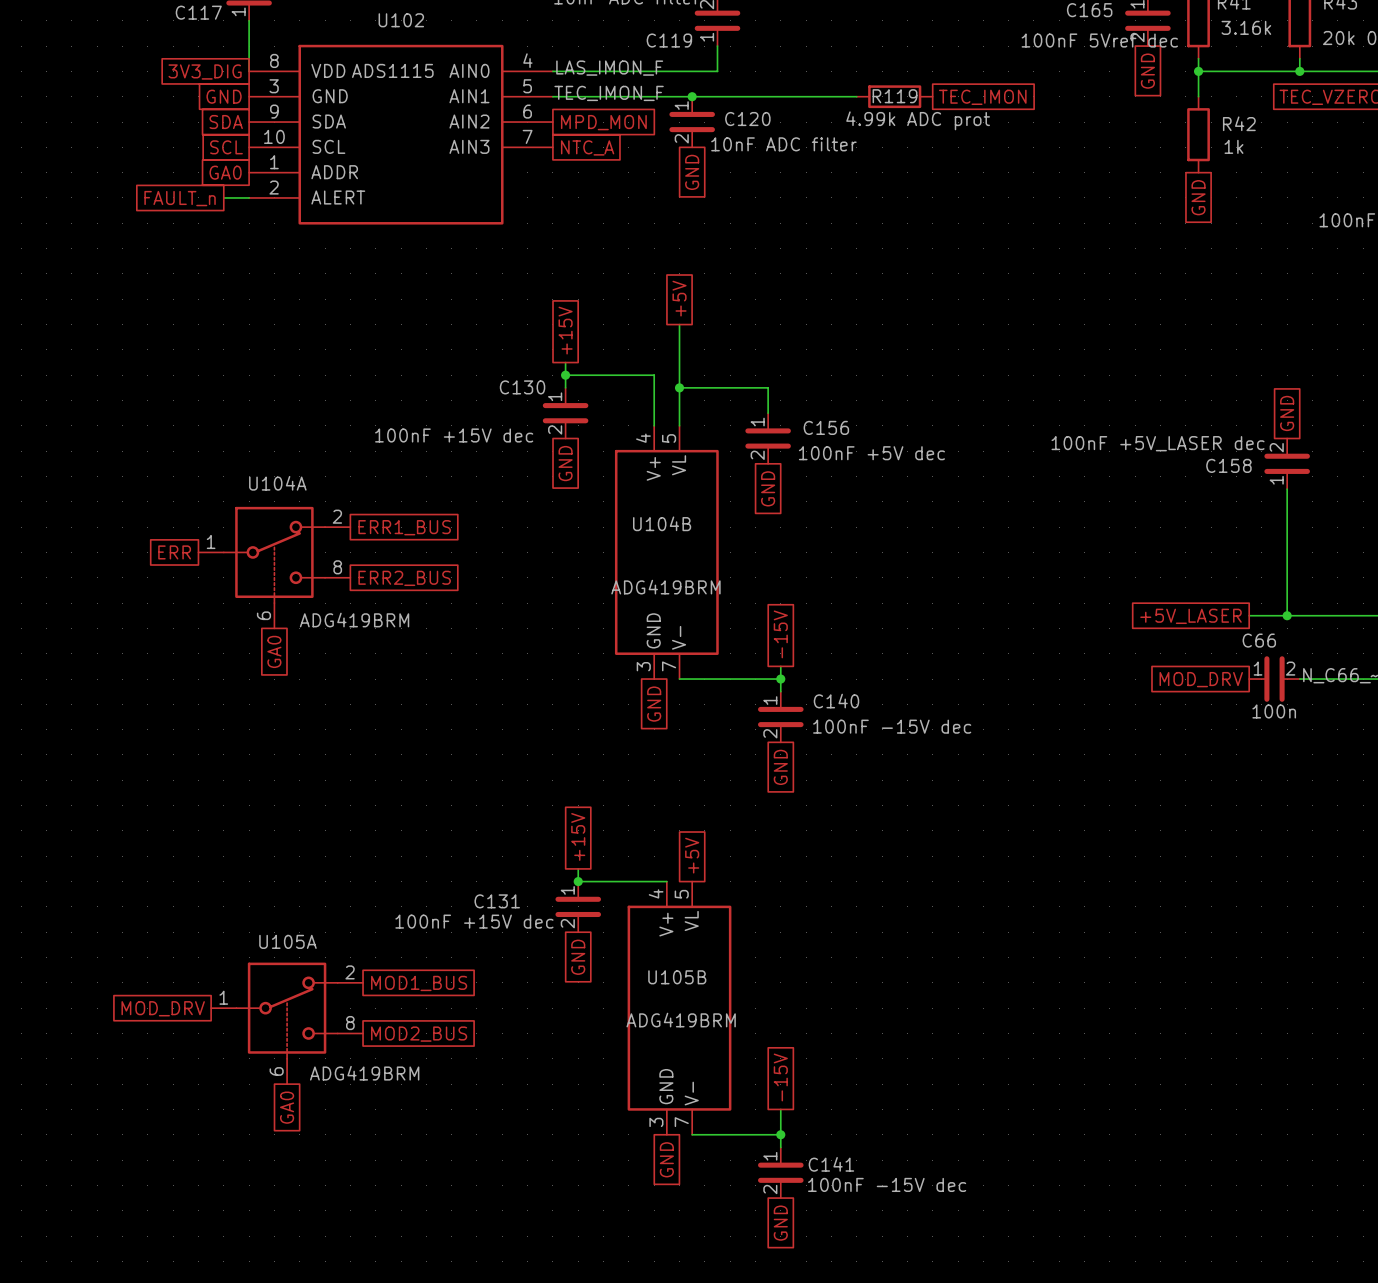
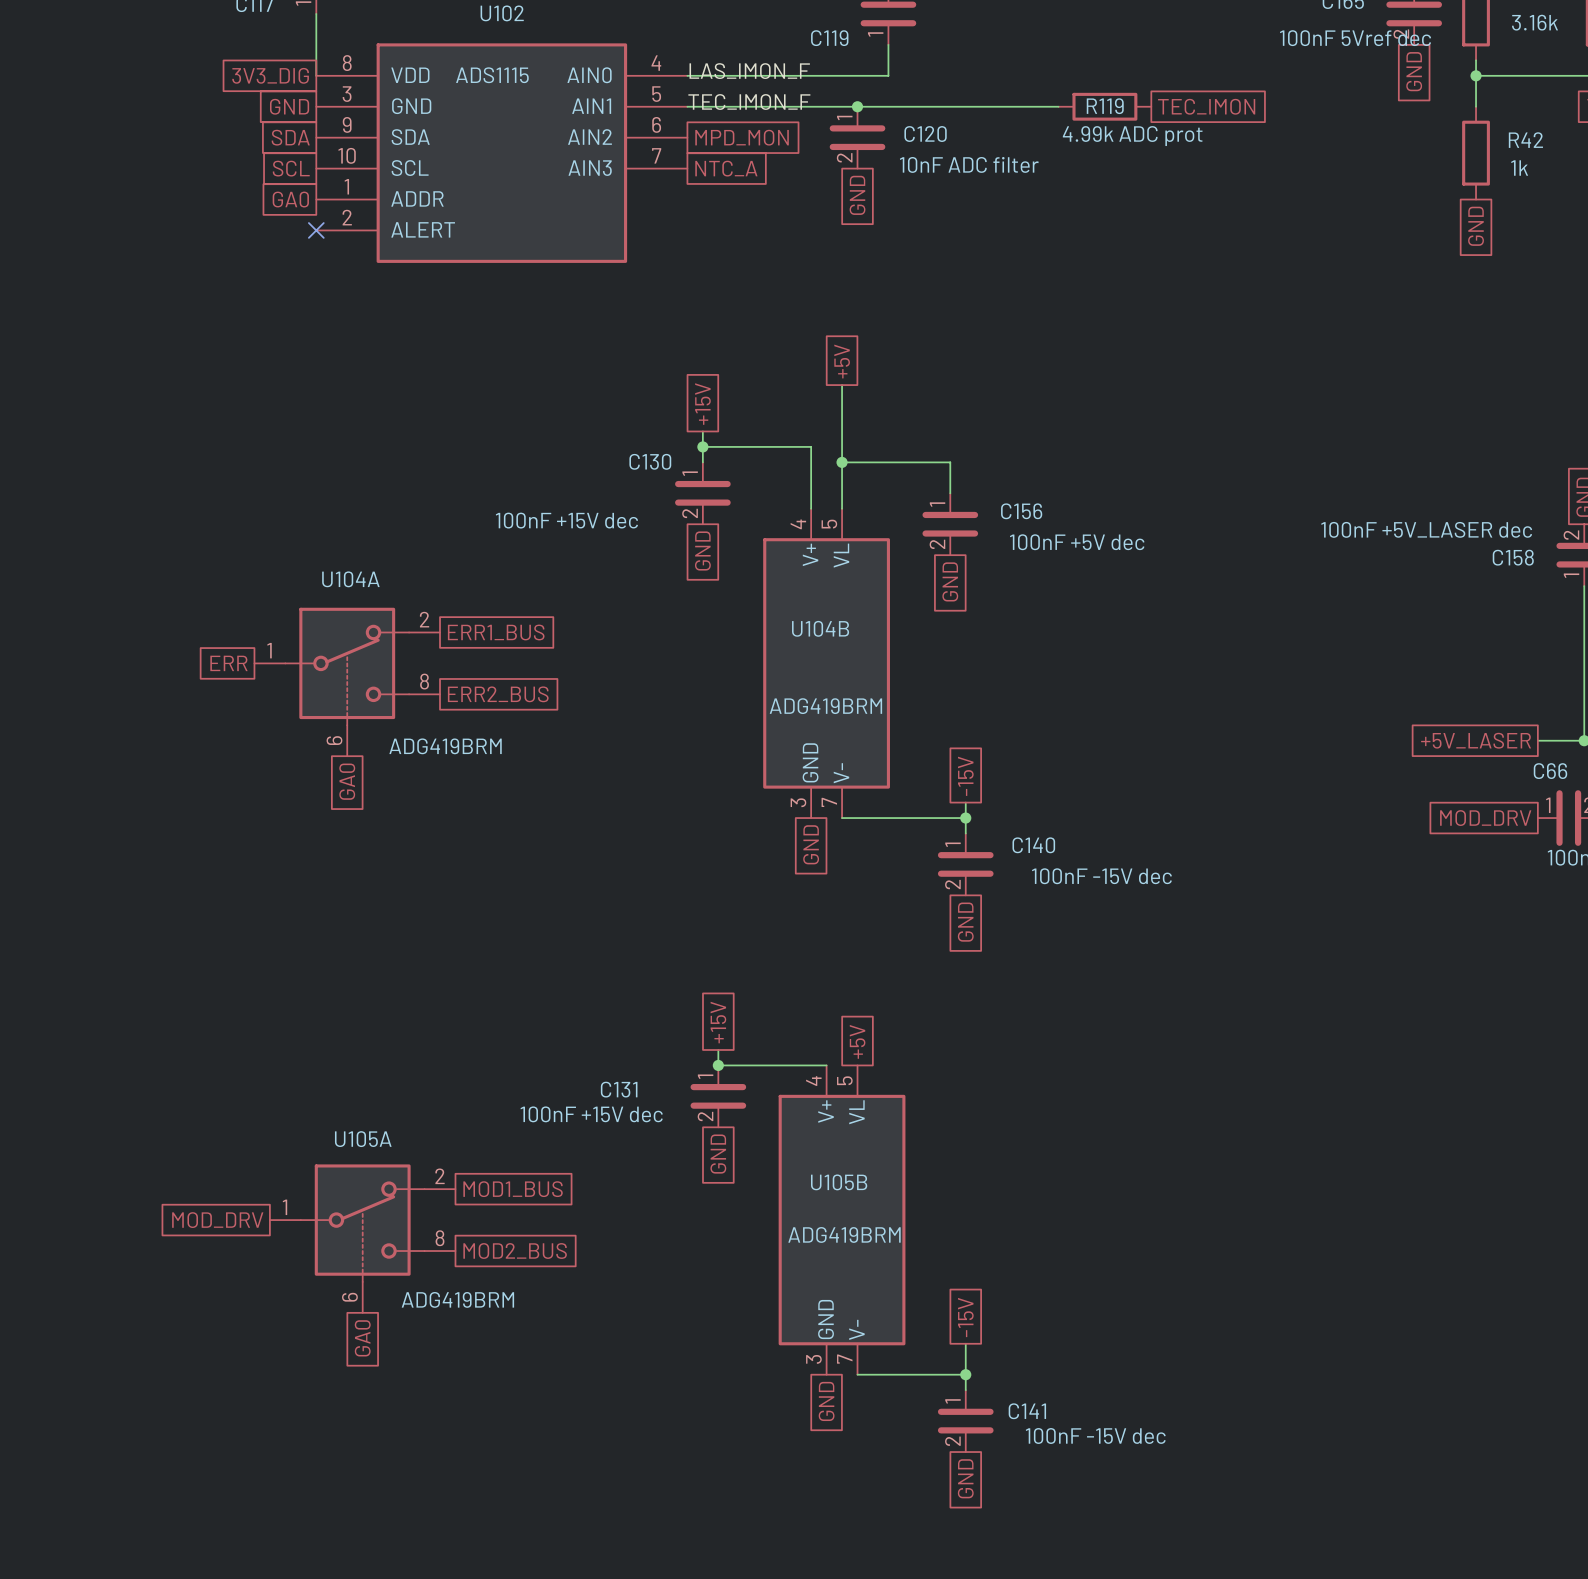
wire: (223, 197) (249, 197) -> none
no-connect mark: none -> (316, 230)
global label: FAULT_n (180, 198) -> none

